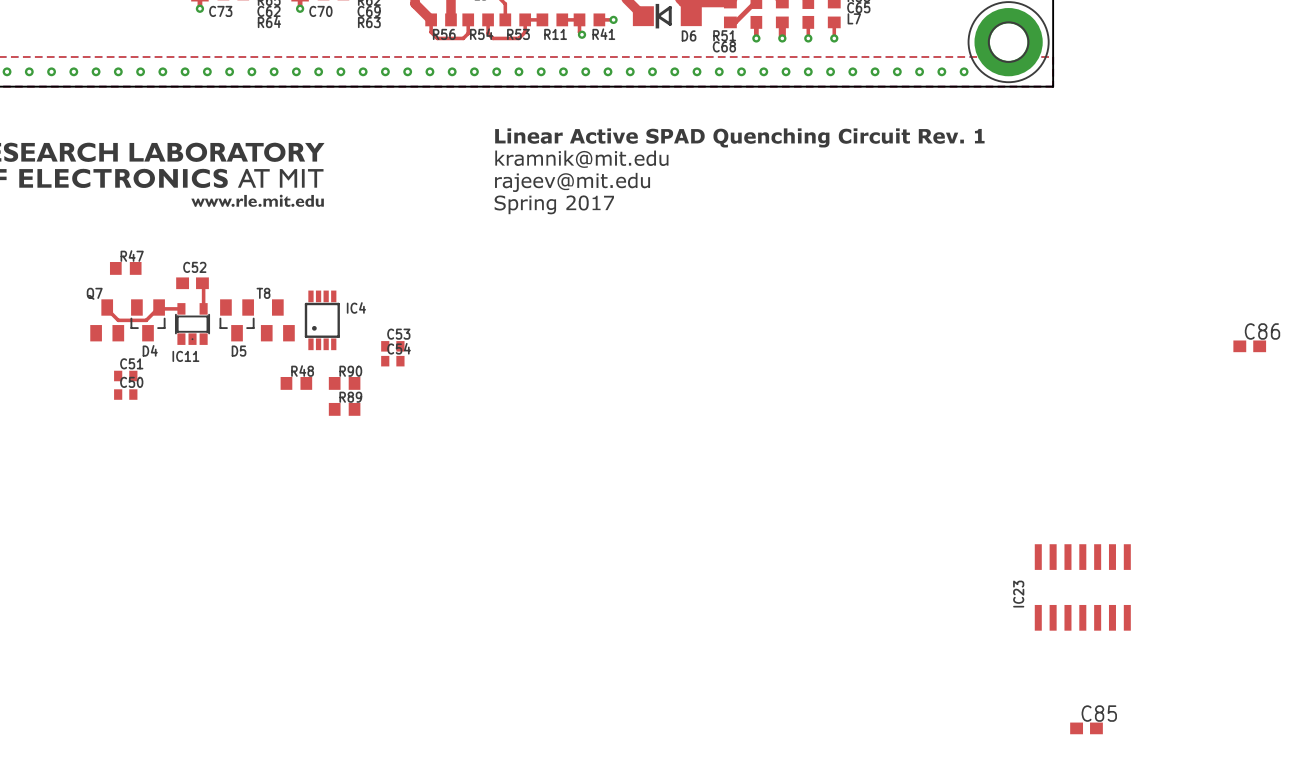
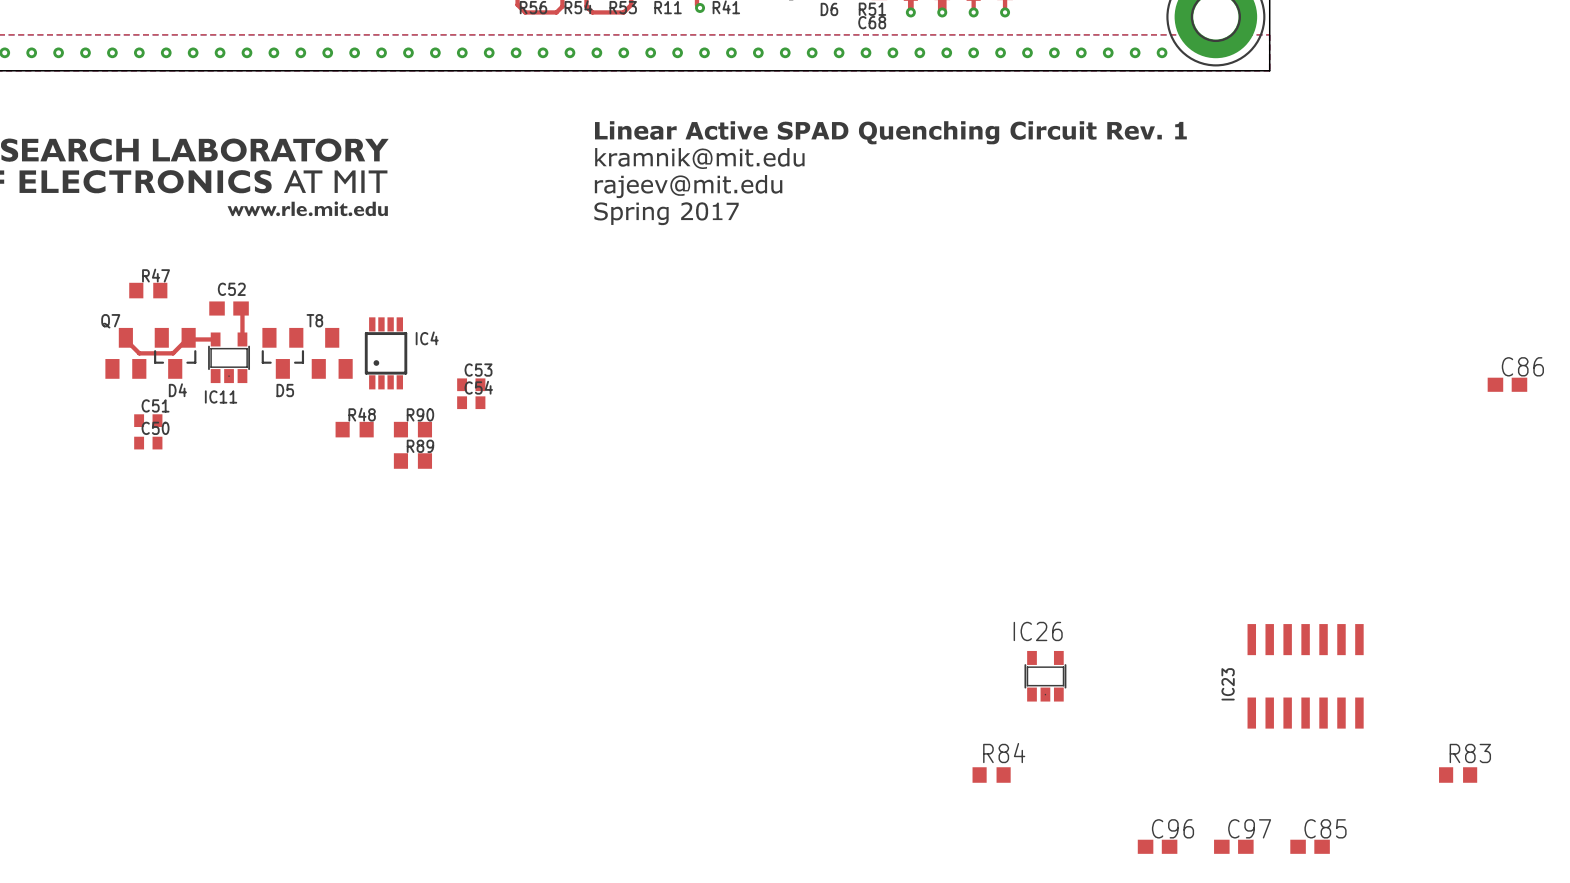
IC26: none -> (1045, 676)
R84: none -> (991, 775)
R83: none -> (1458, 775)
C96: none -> (1157, 846)
C97: none -> (1233, 846)

